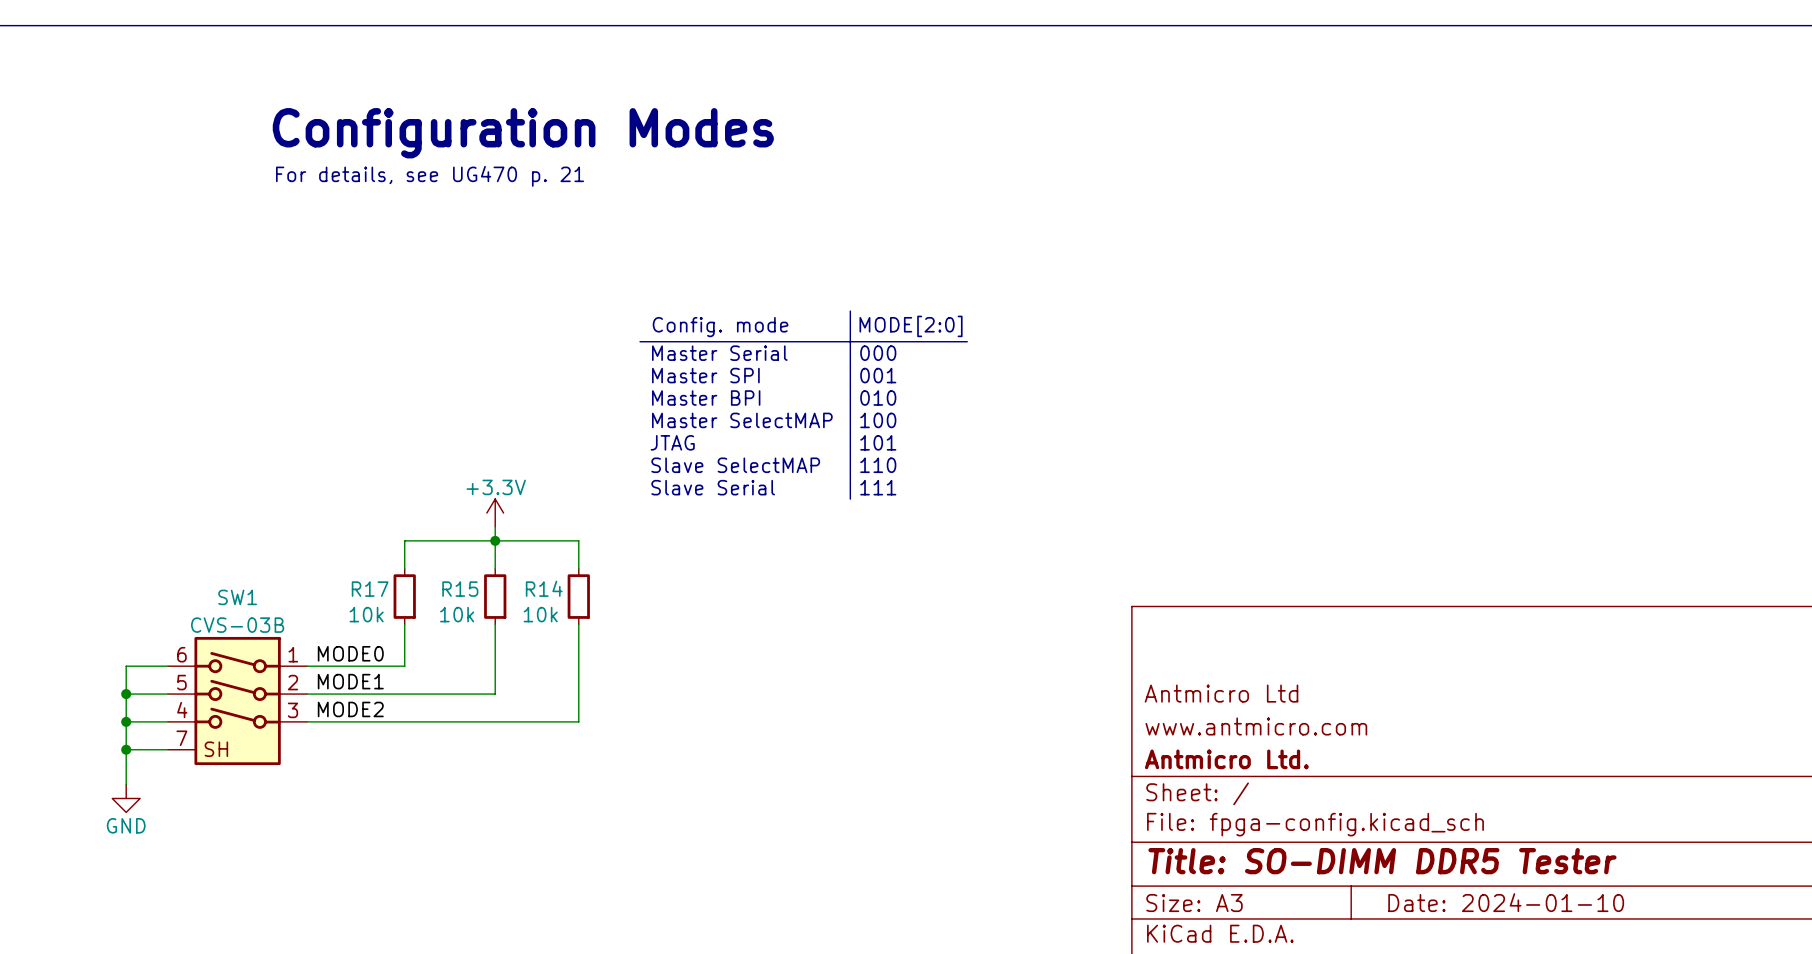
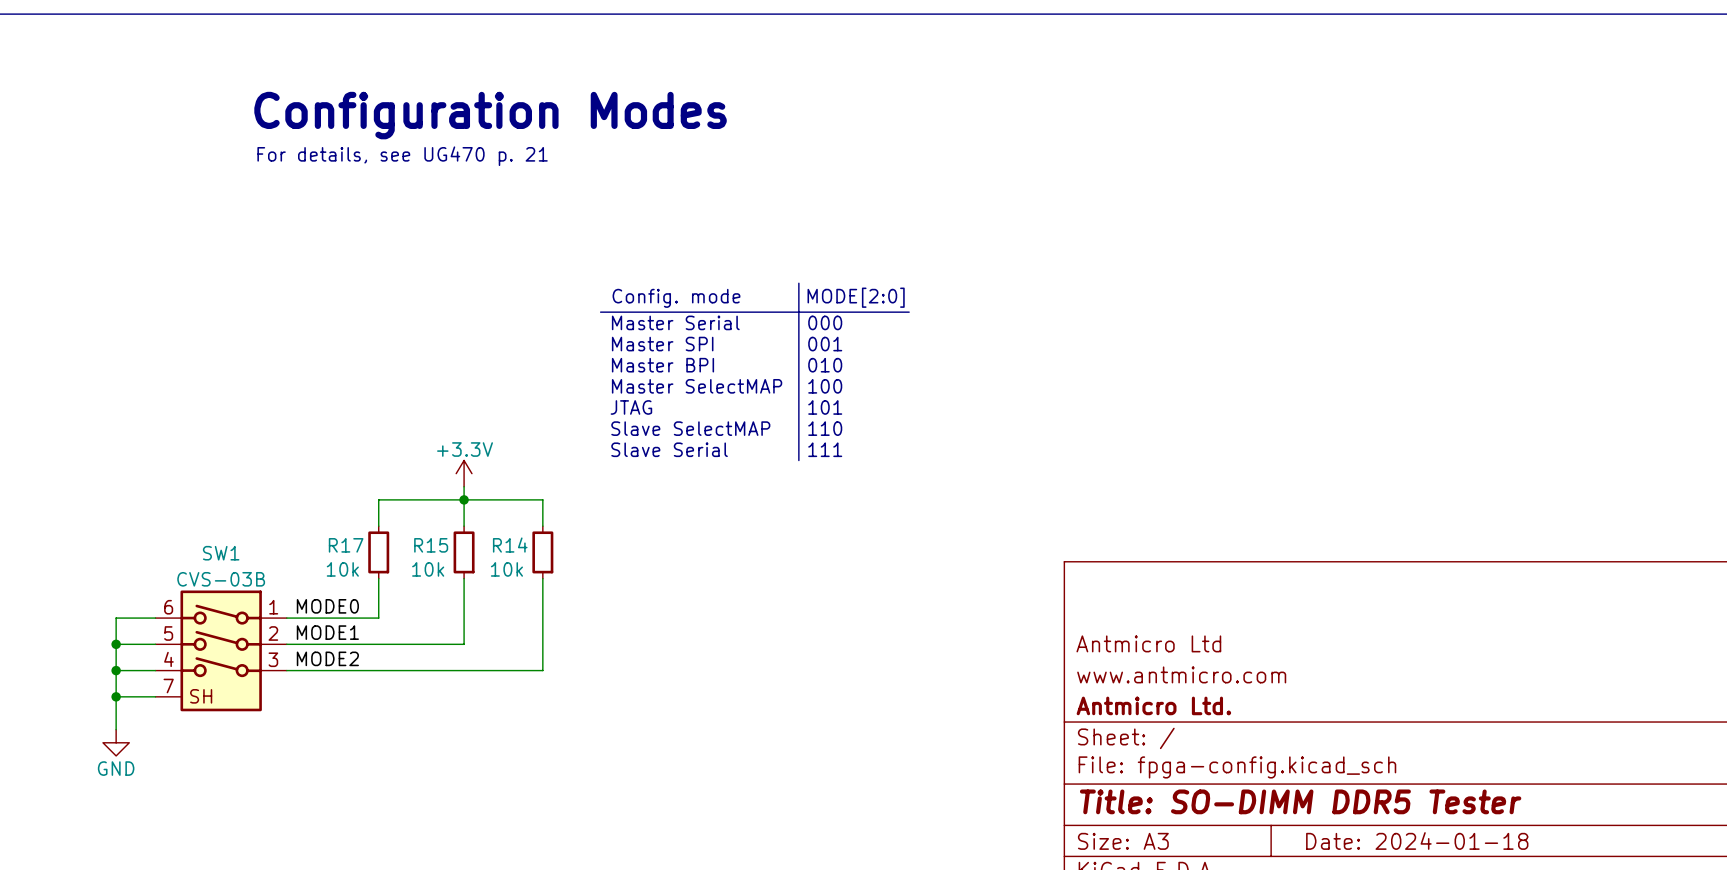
title block: Date: 2024-01-10 (1506, 902) -> Date: 2024-01-18 (1417, 840)

